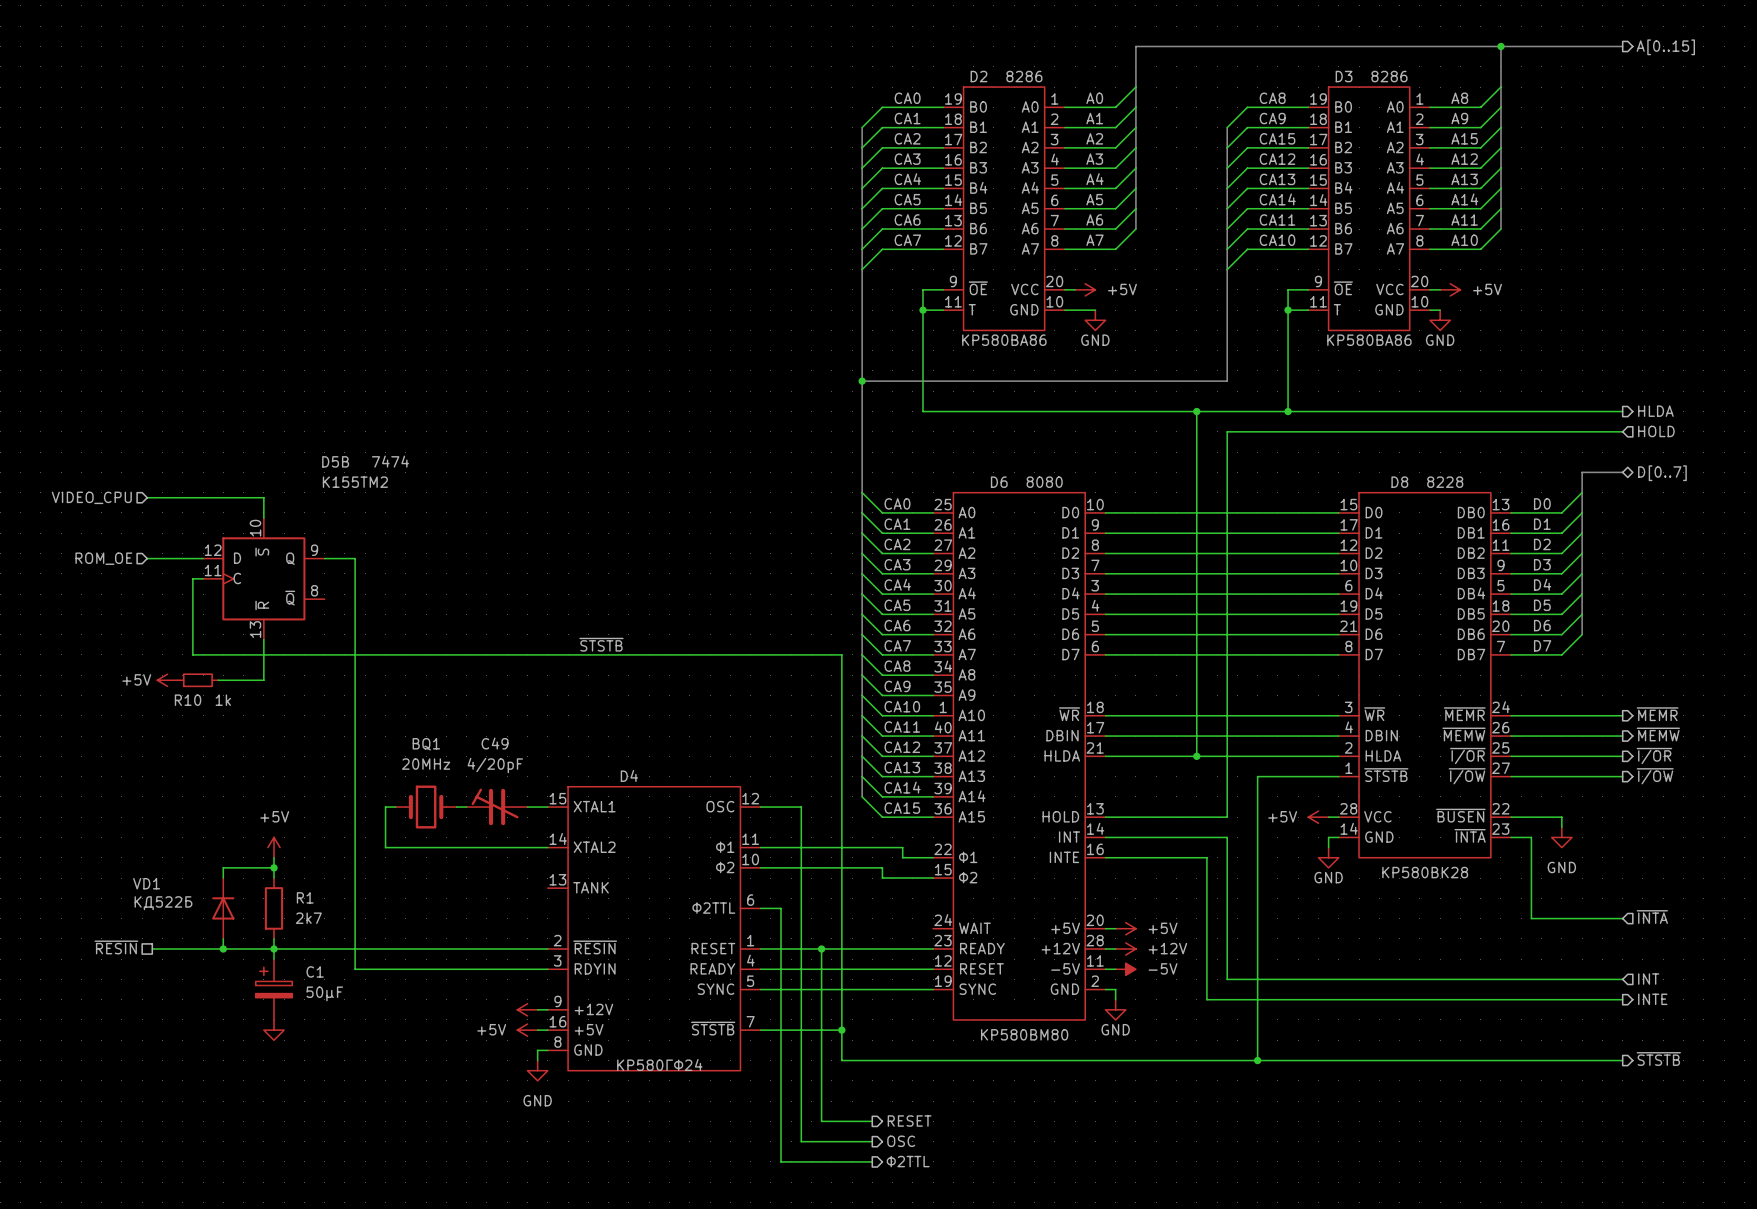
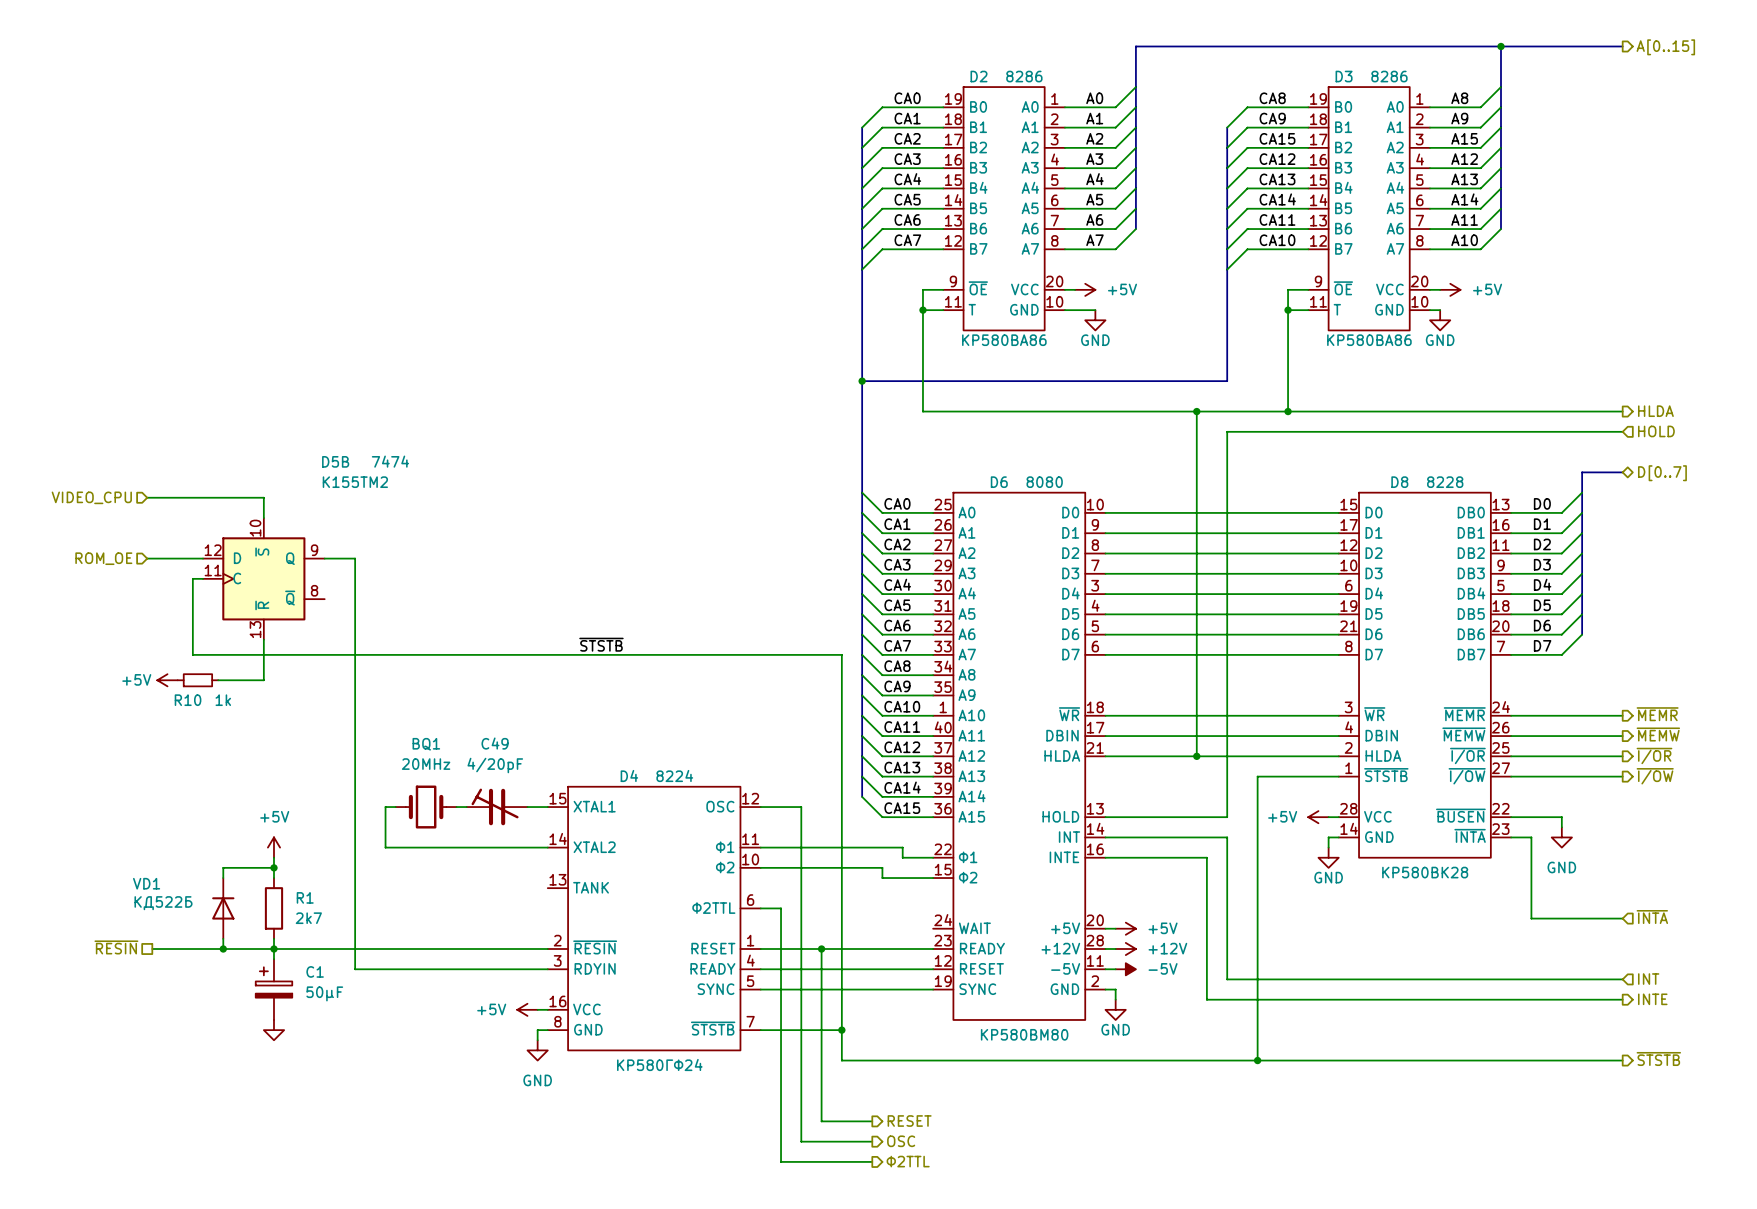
D4 value: none -> 8224 (674, 775)
D4 symbol: [547, 786, 761, 1071] -> [547, 786, 761, 1051]
power symbol text: none -> +5V (491, 1009)
power symbol: +5V (527, 1030) -> none
wire: none -> (537, 1030) (537, 1040)
power symbol position: GND (537, 1070) -> GND (537, 1050)

